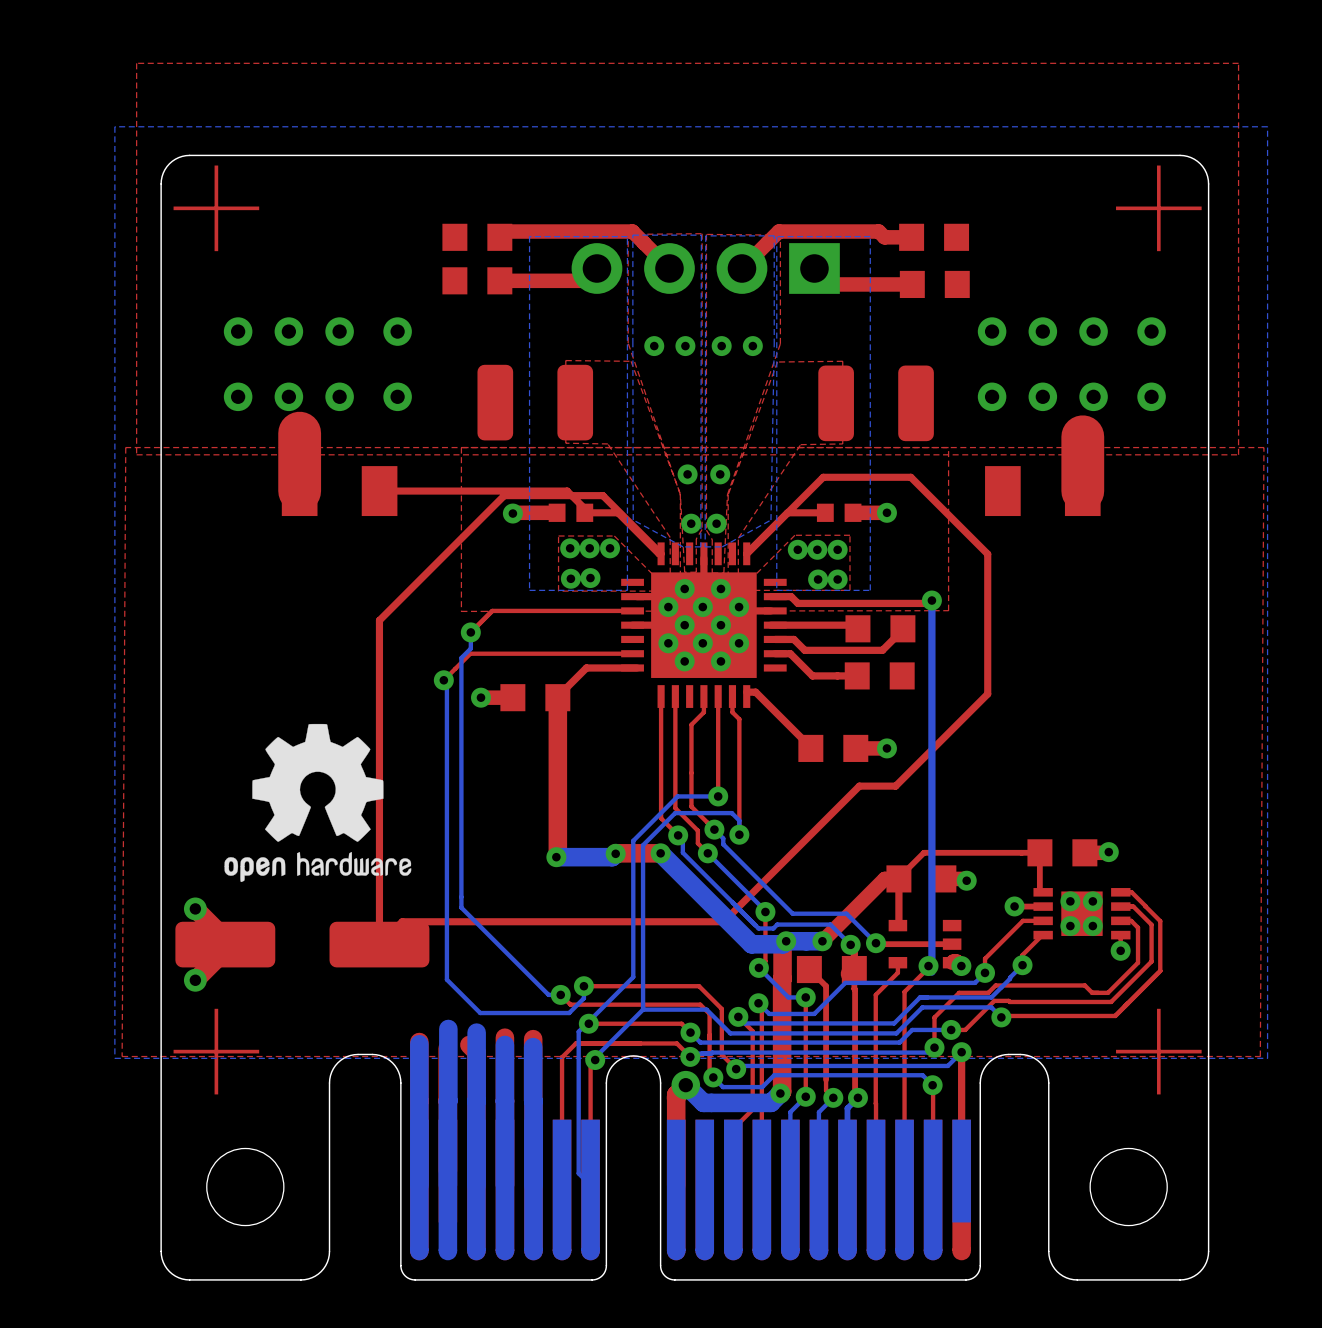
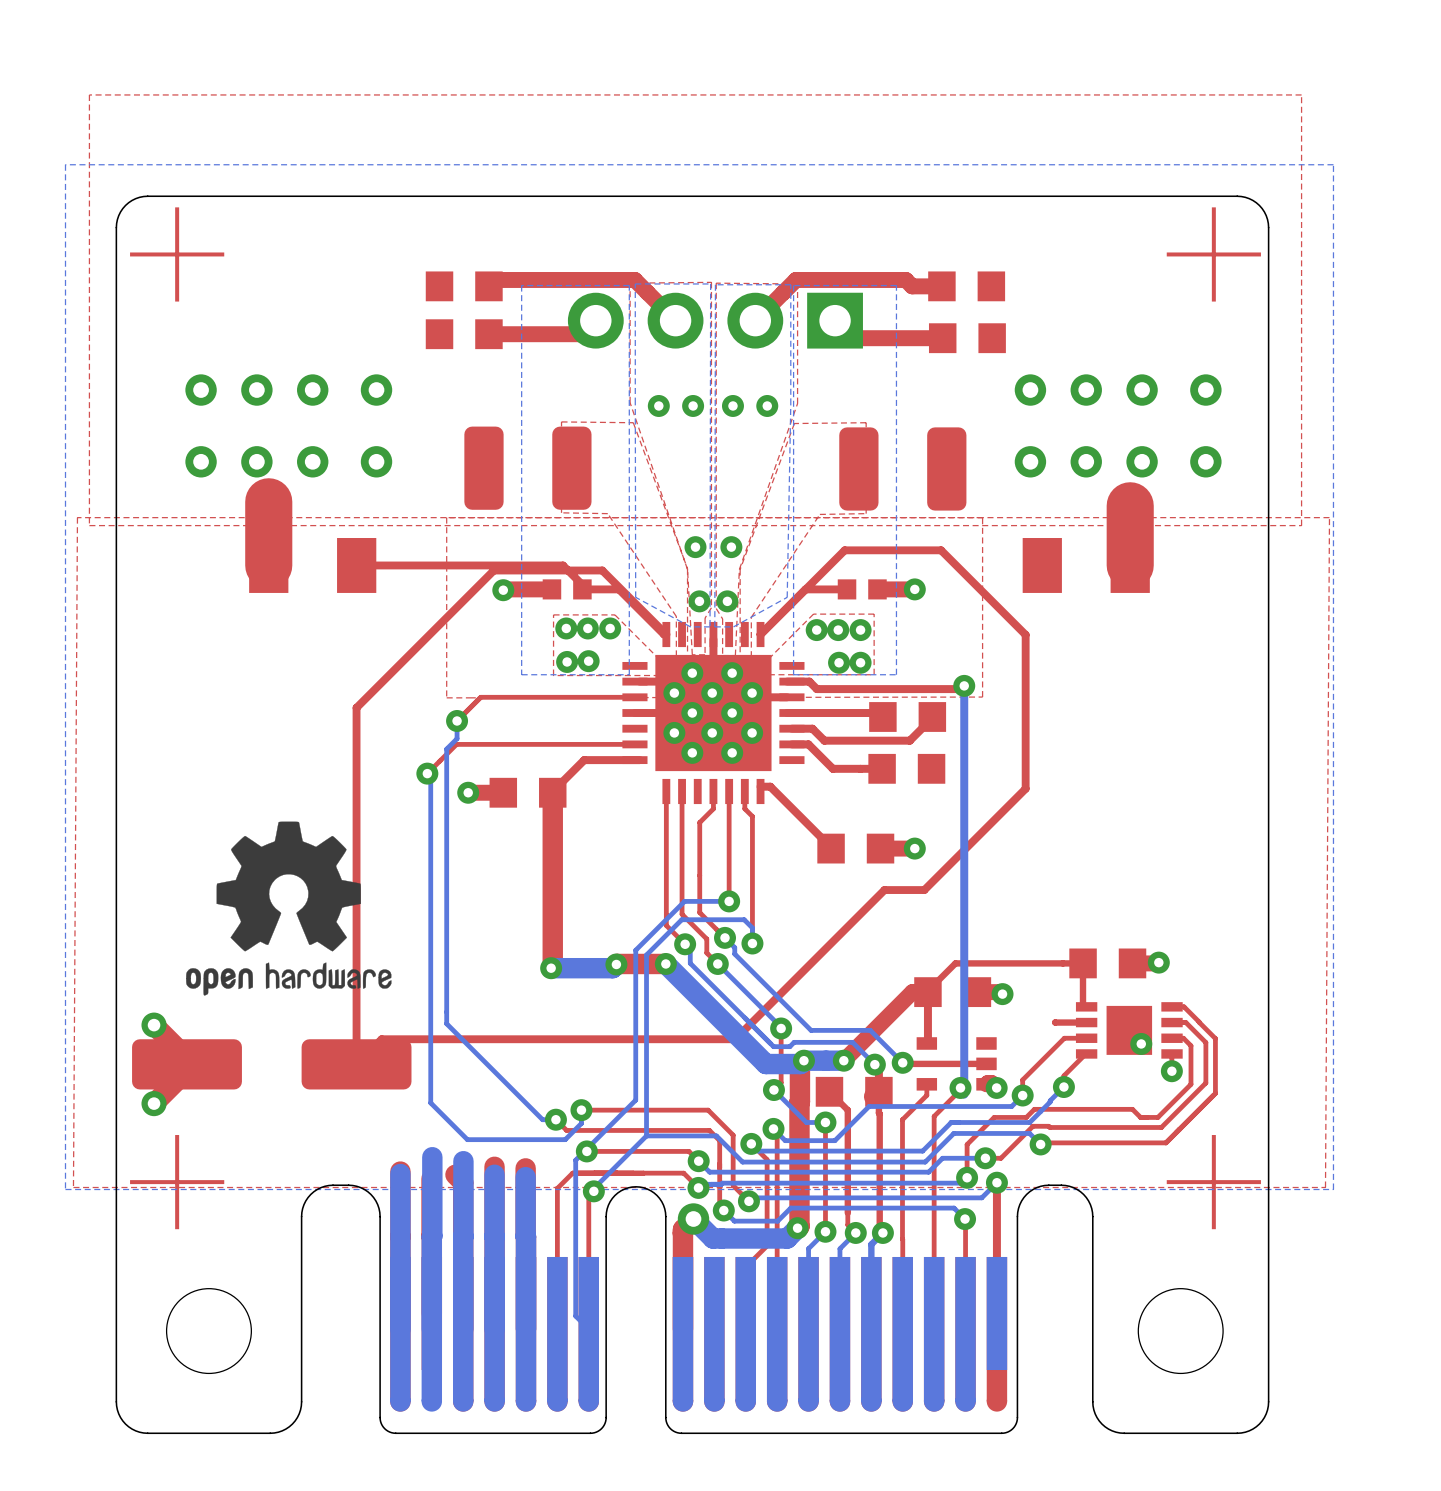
via: (1070, 901) -> none
via: (1092, 901) -> none
via: (1014, 906) -> none
via: (1070, 926) -> none

